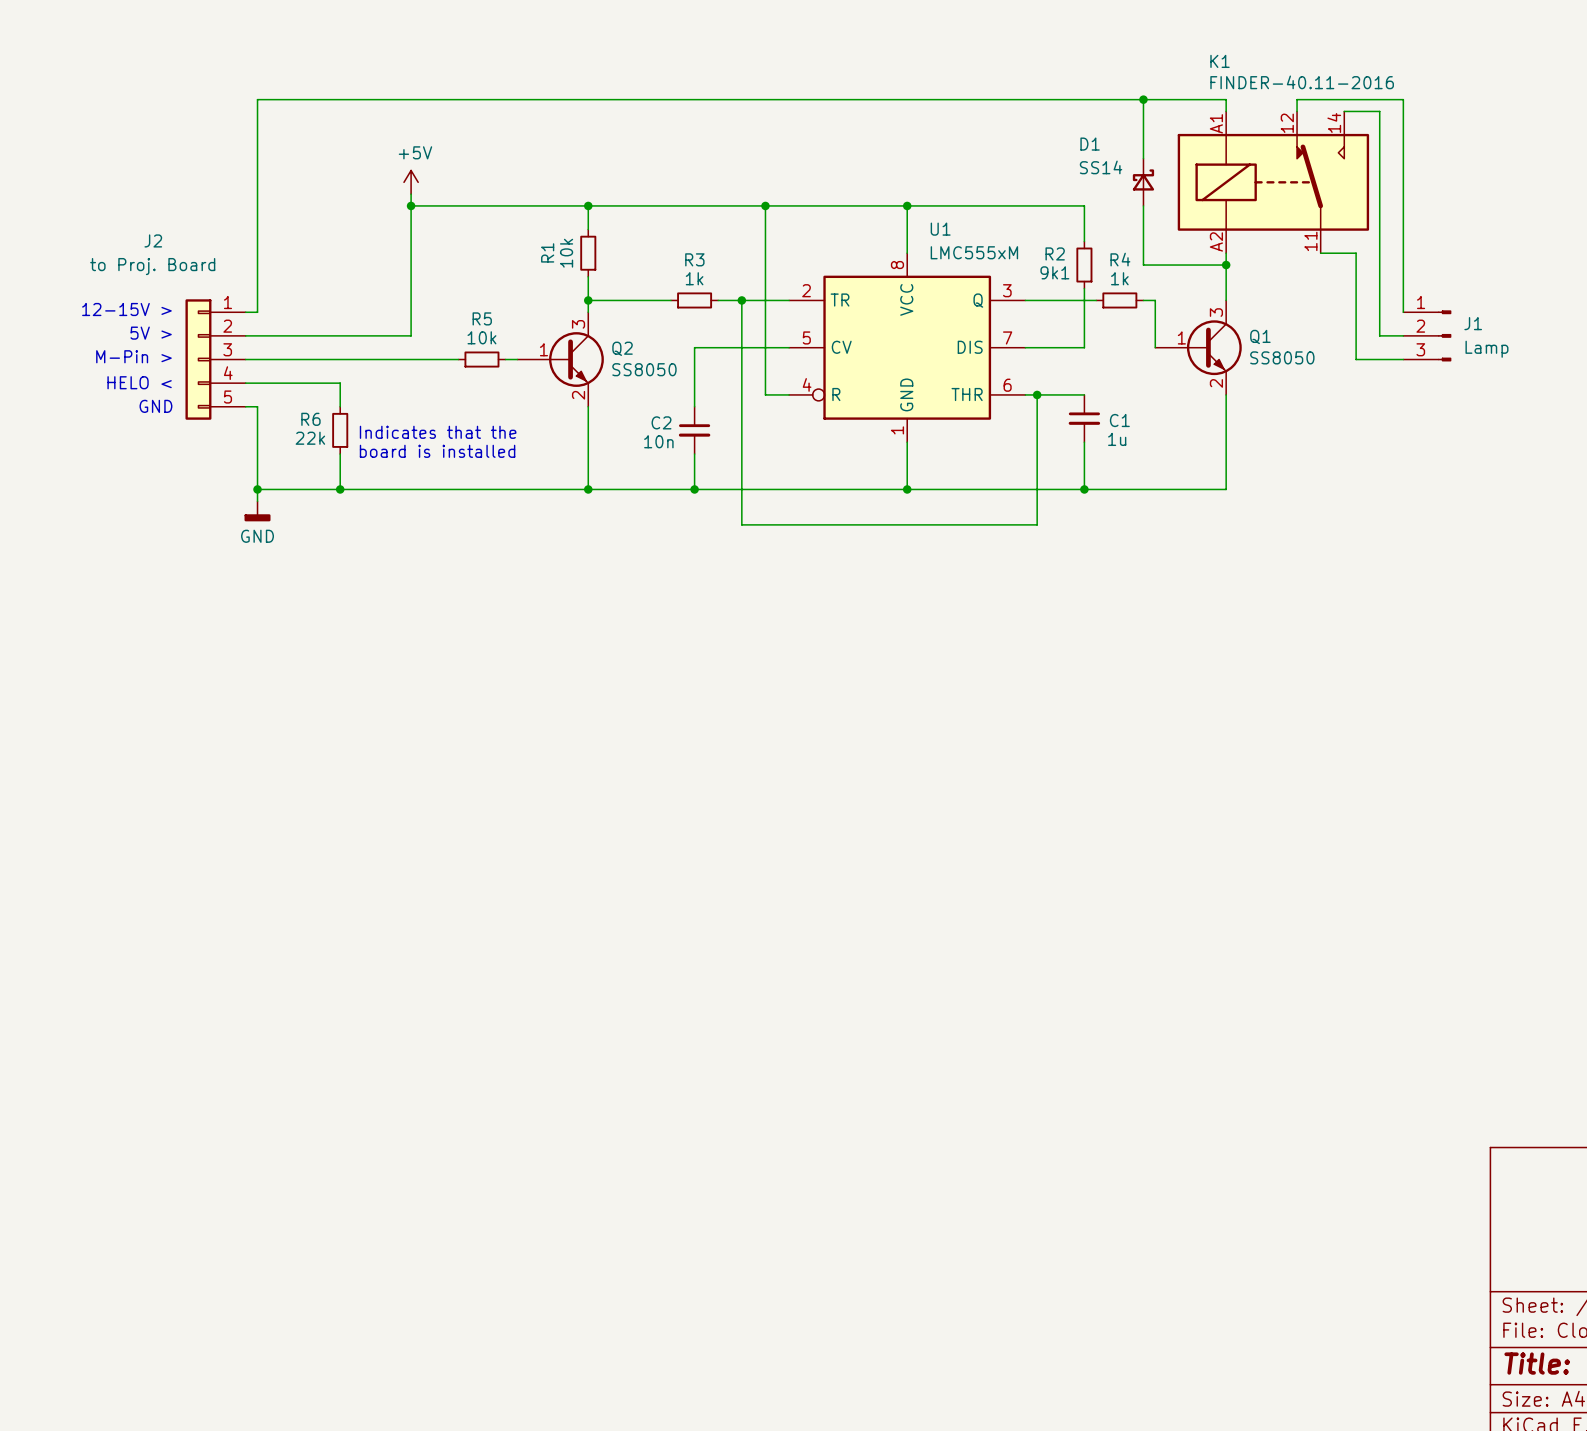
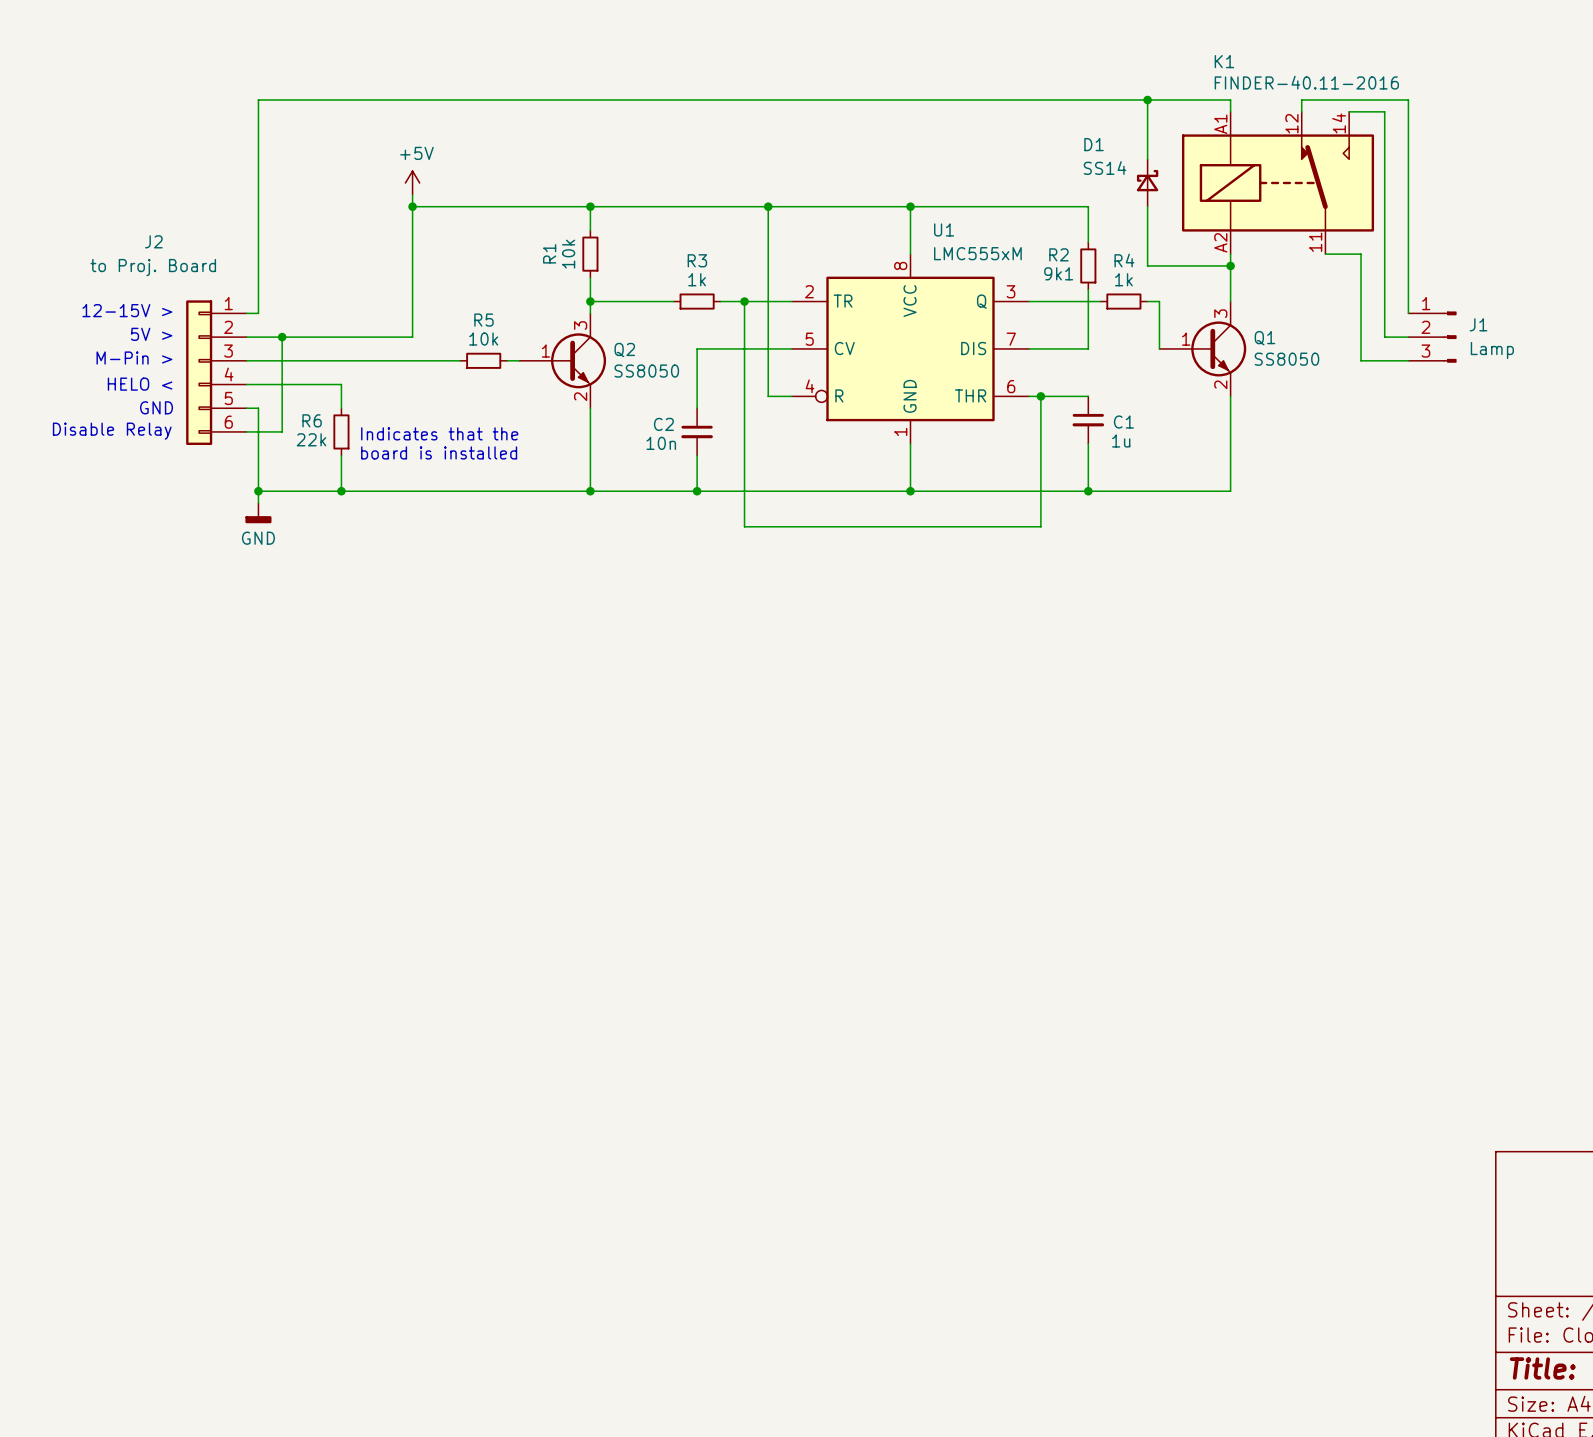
J2 symbol: [185, 299, 246, 420] -> [186, 300, 247, 445]
wire: none -> (282, 337) (282, 431) (246, 431)
junction: none -> (282, 337)
text: none -> Disable Relay (112, 431)

